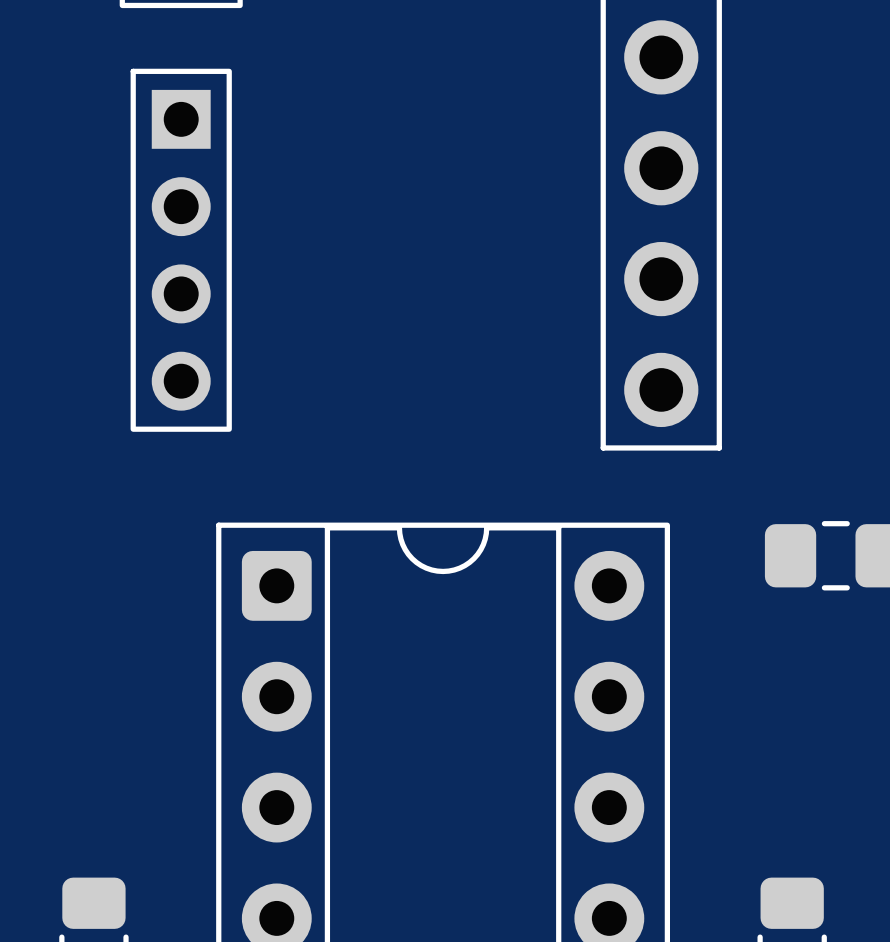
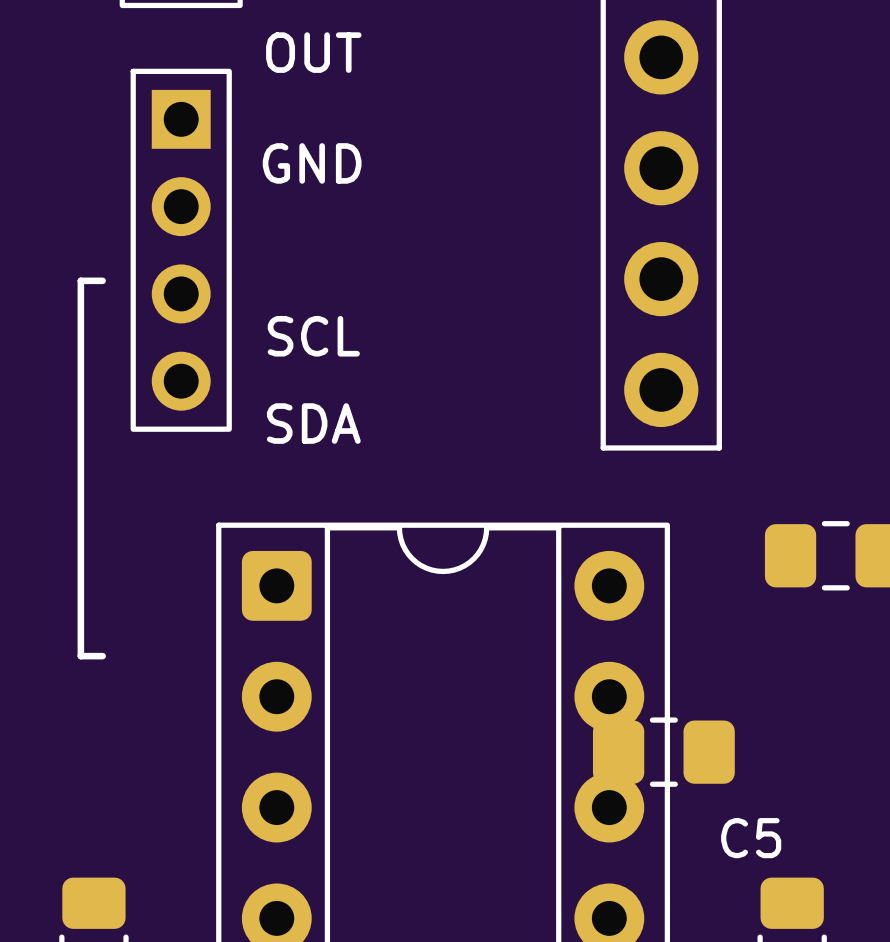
text: none -> OUT (313, 52)
text: none -> GND (312, 163)
line: none -> (102, 280) (80, 280) (80, 656) (102, 656)
text: none -> SCL (313, 336)
text: none -> SDA (313, 423)
C5: none -> (663, 752)

